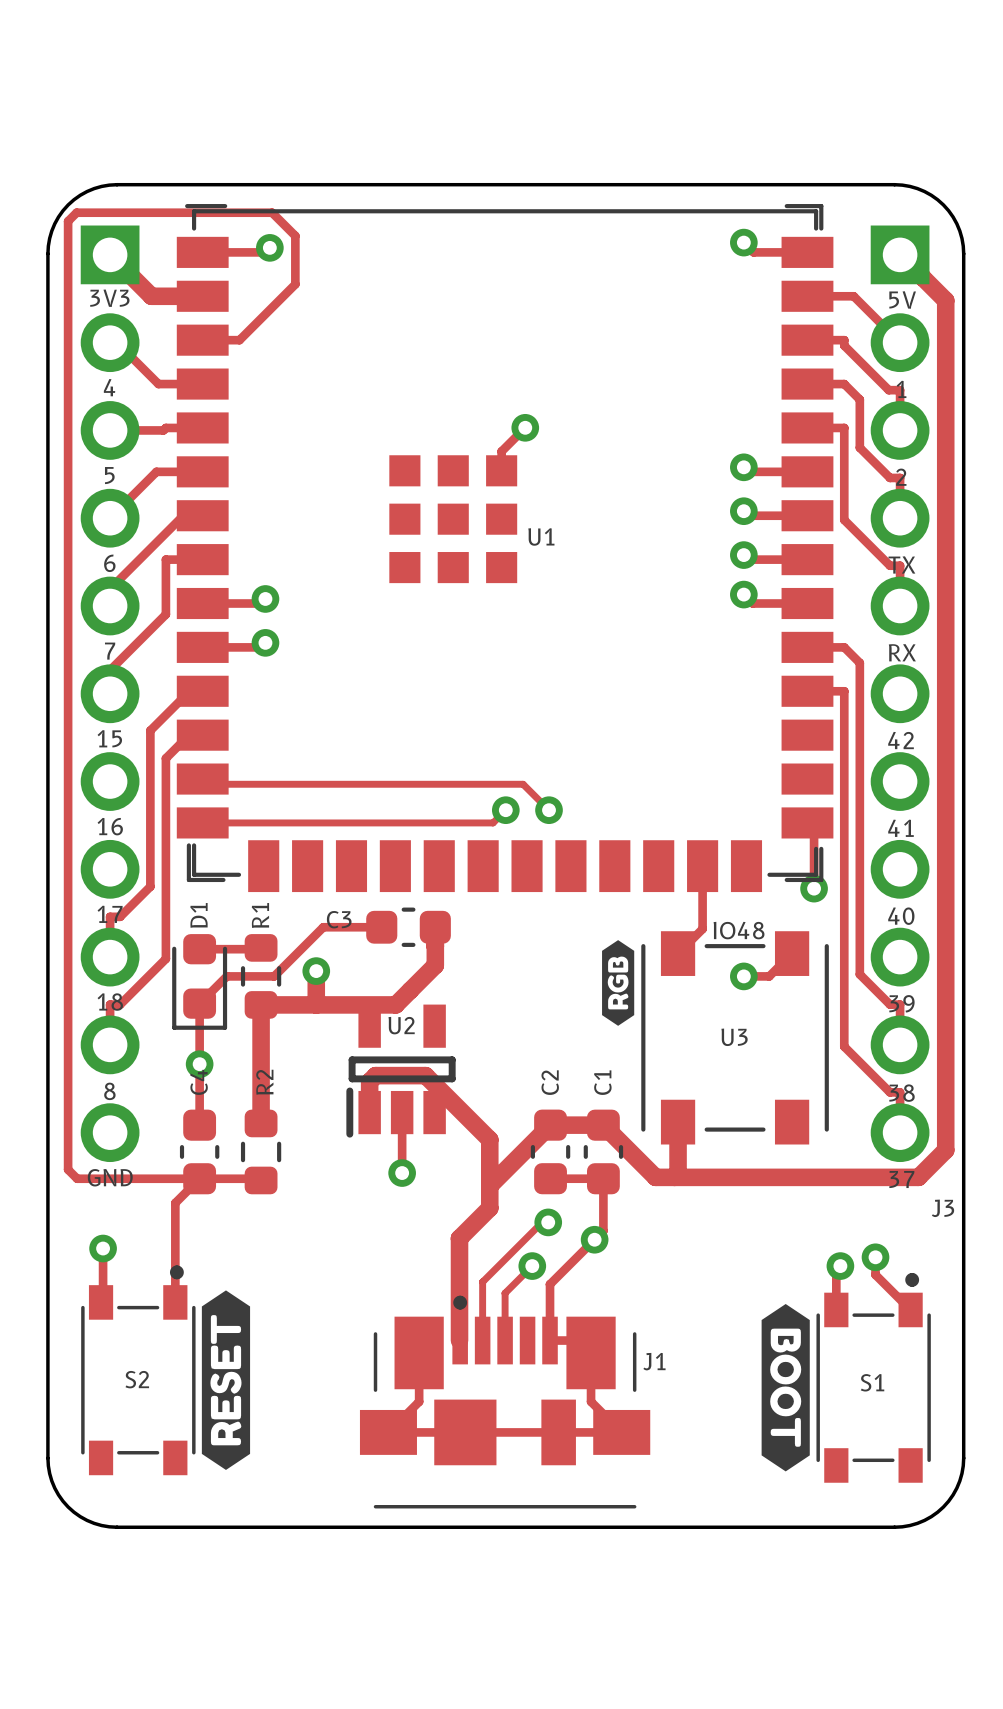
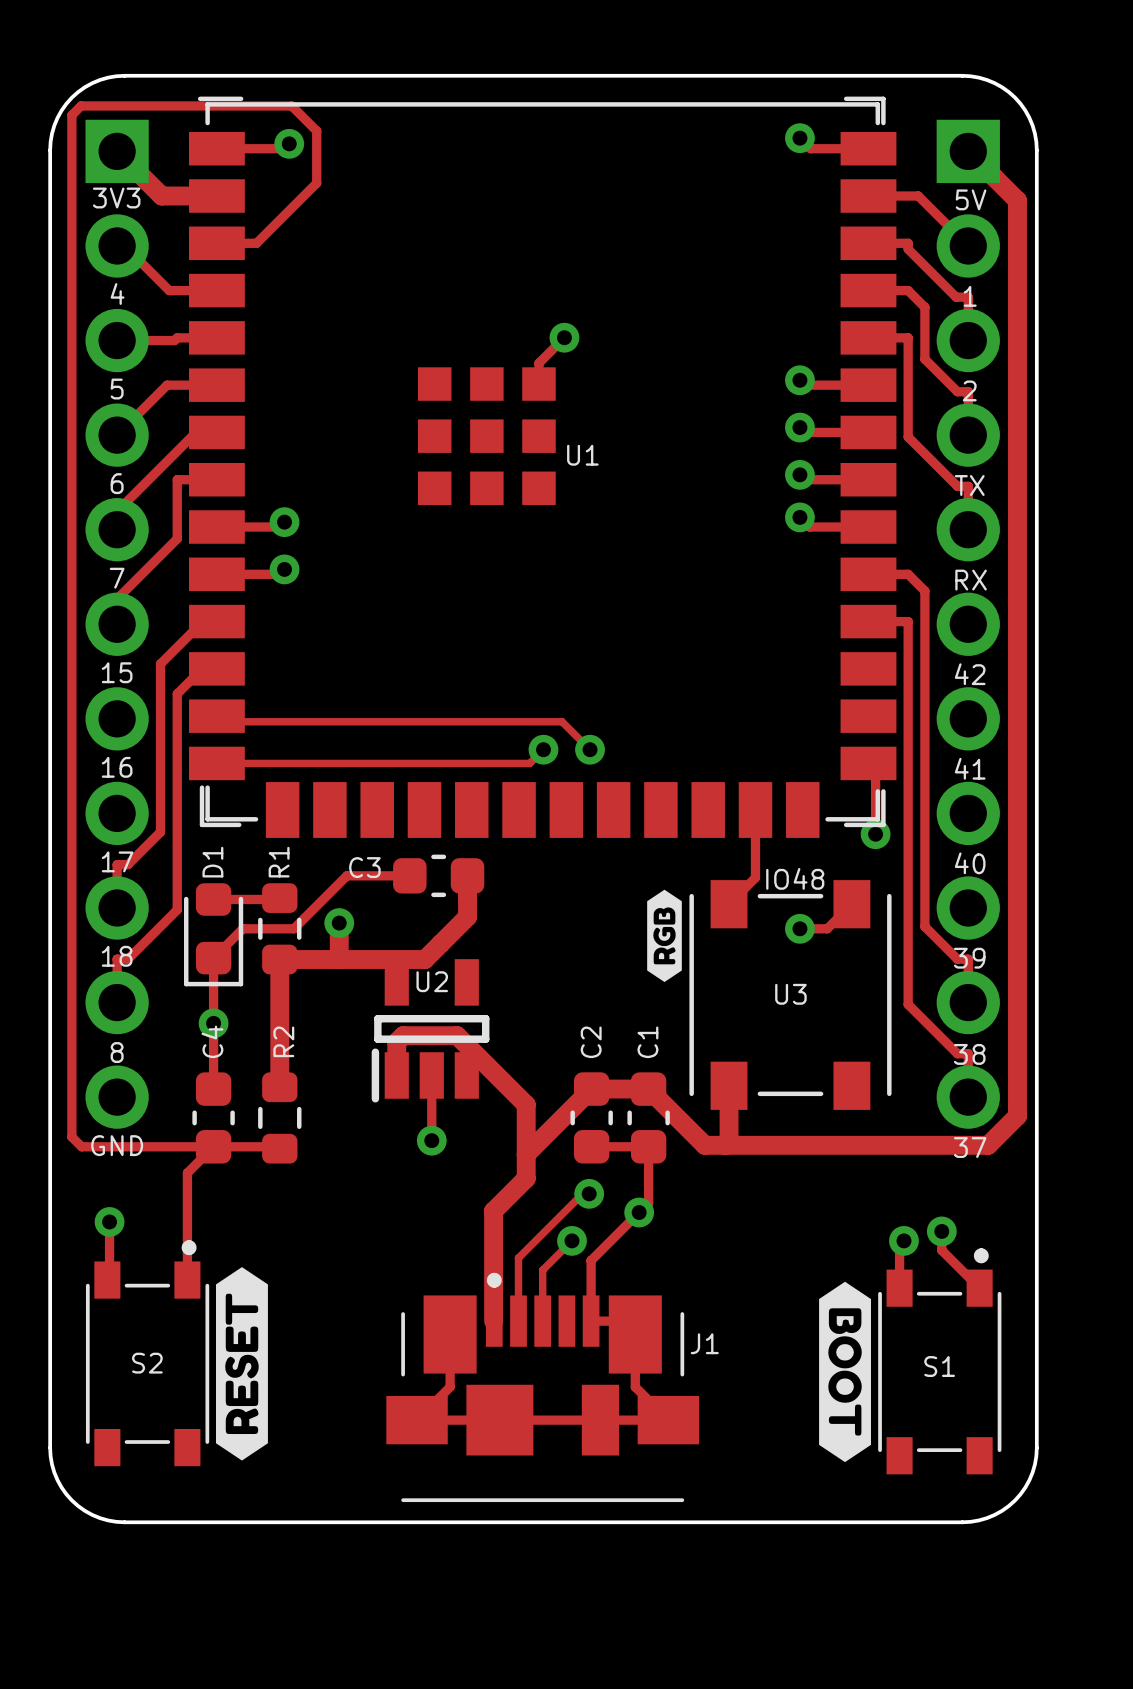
J3 name: J3 (943, 1208) -> none

